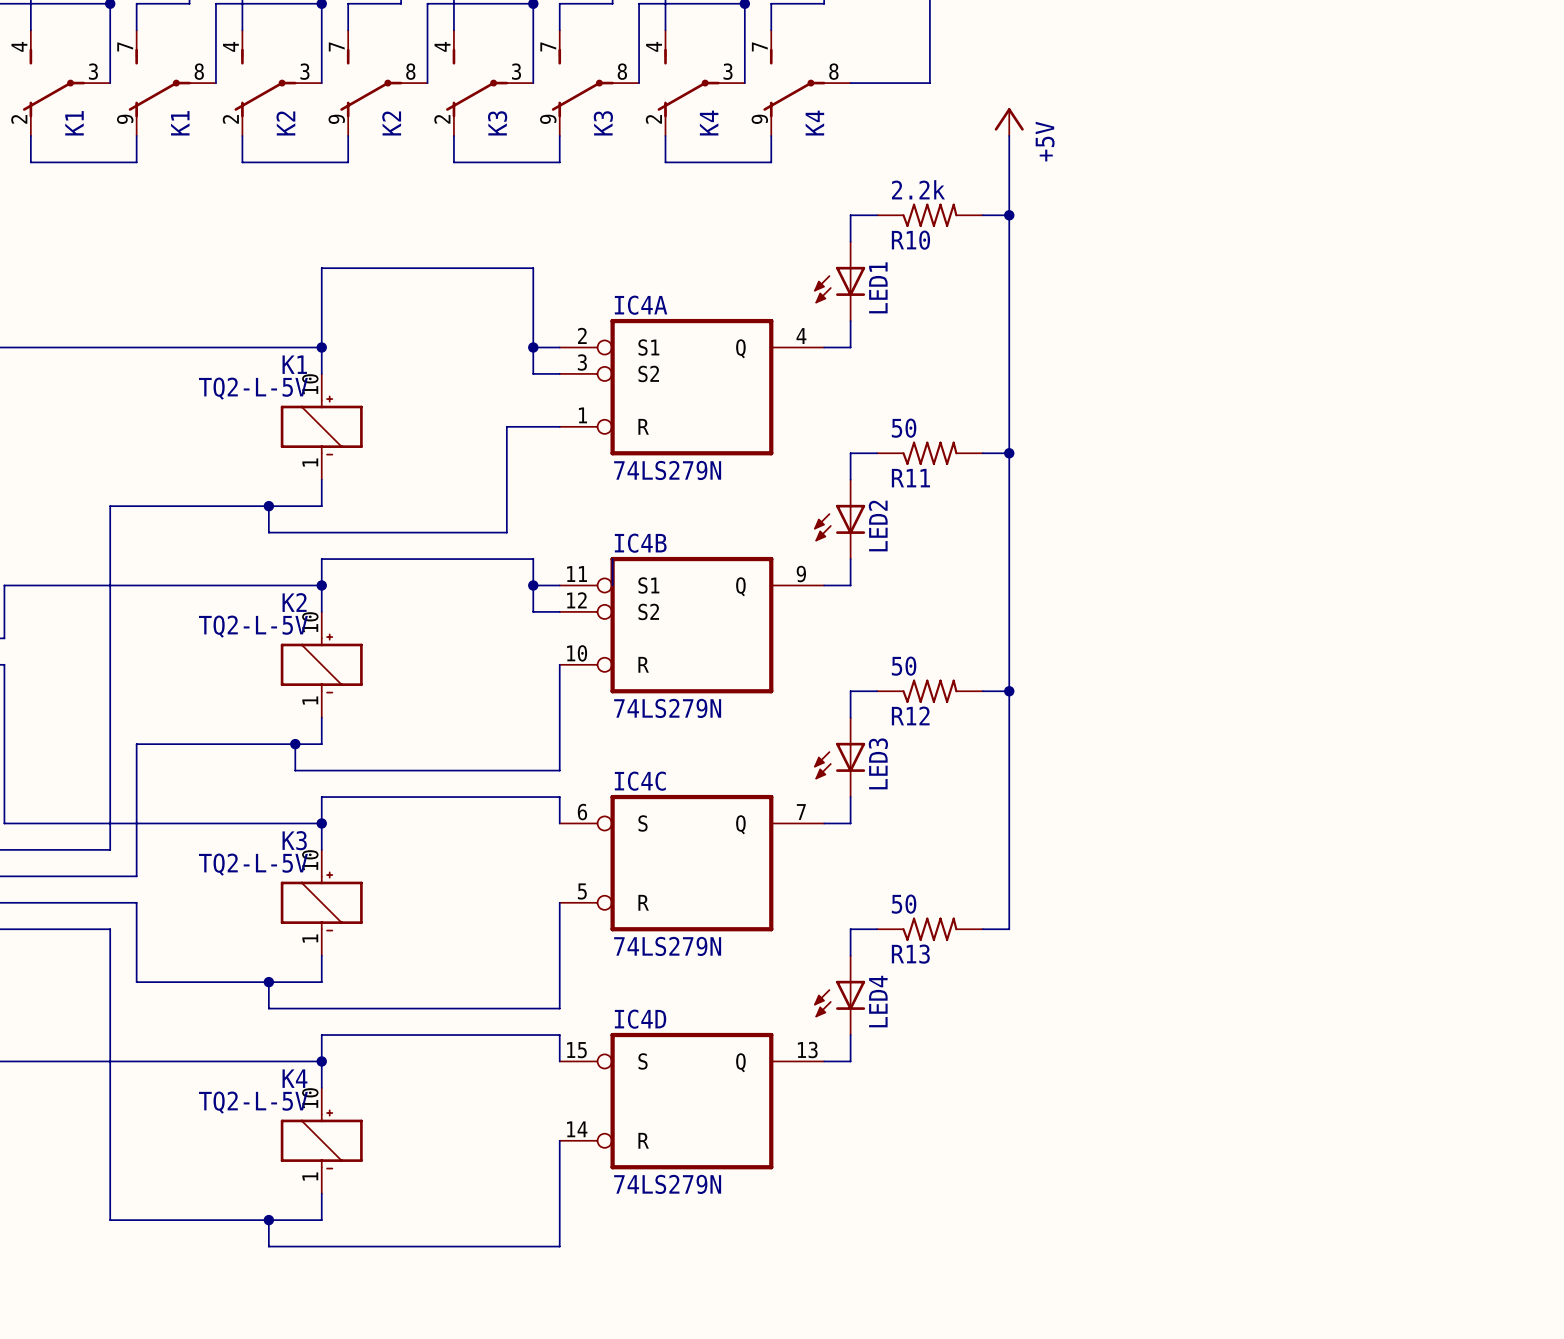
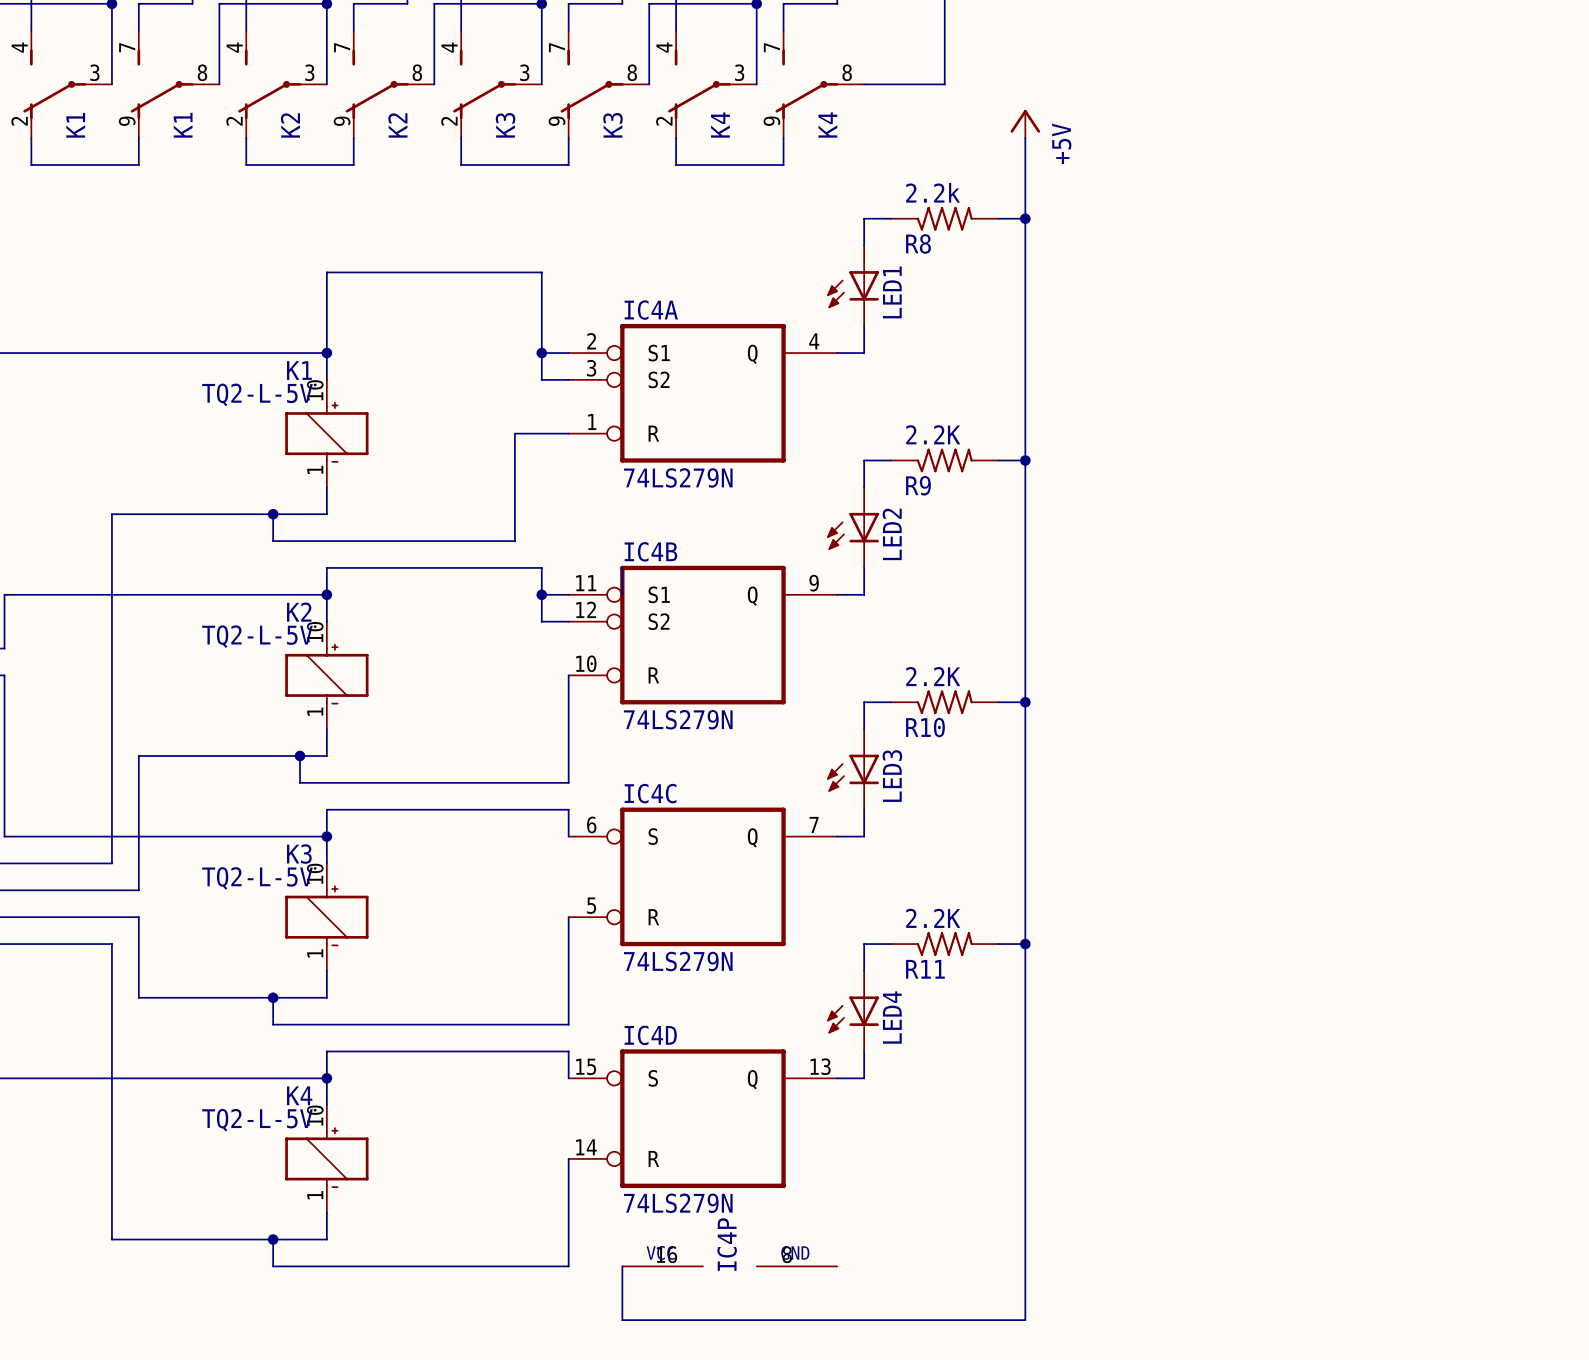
R10 name: R10 (910, 240) -> R8 (918, 243)
R11 value: 50 (904, 428) -> 2.2K (933, 434)
R11 name: R11 (910, 478) -> R9 (918, 485)
R12 value: 50 (904, 666) -> 2.2K (933, 676)
R12 name: R12 (910, 715) -> R10 (925, 727)
R13 value: 50 (904, 904) -> 2.2K (933, 918)
wire: none -> (1025, 944) (1025, 1320) (622, 1320) (622, 1266)
junction: none -> (1025, 944)
R13 name: R13 (910, 954) -> R11 (925, 969)
IC4P: none -> (729, 1266)

